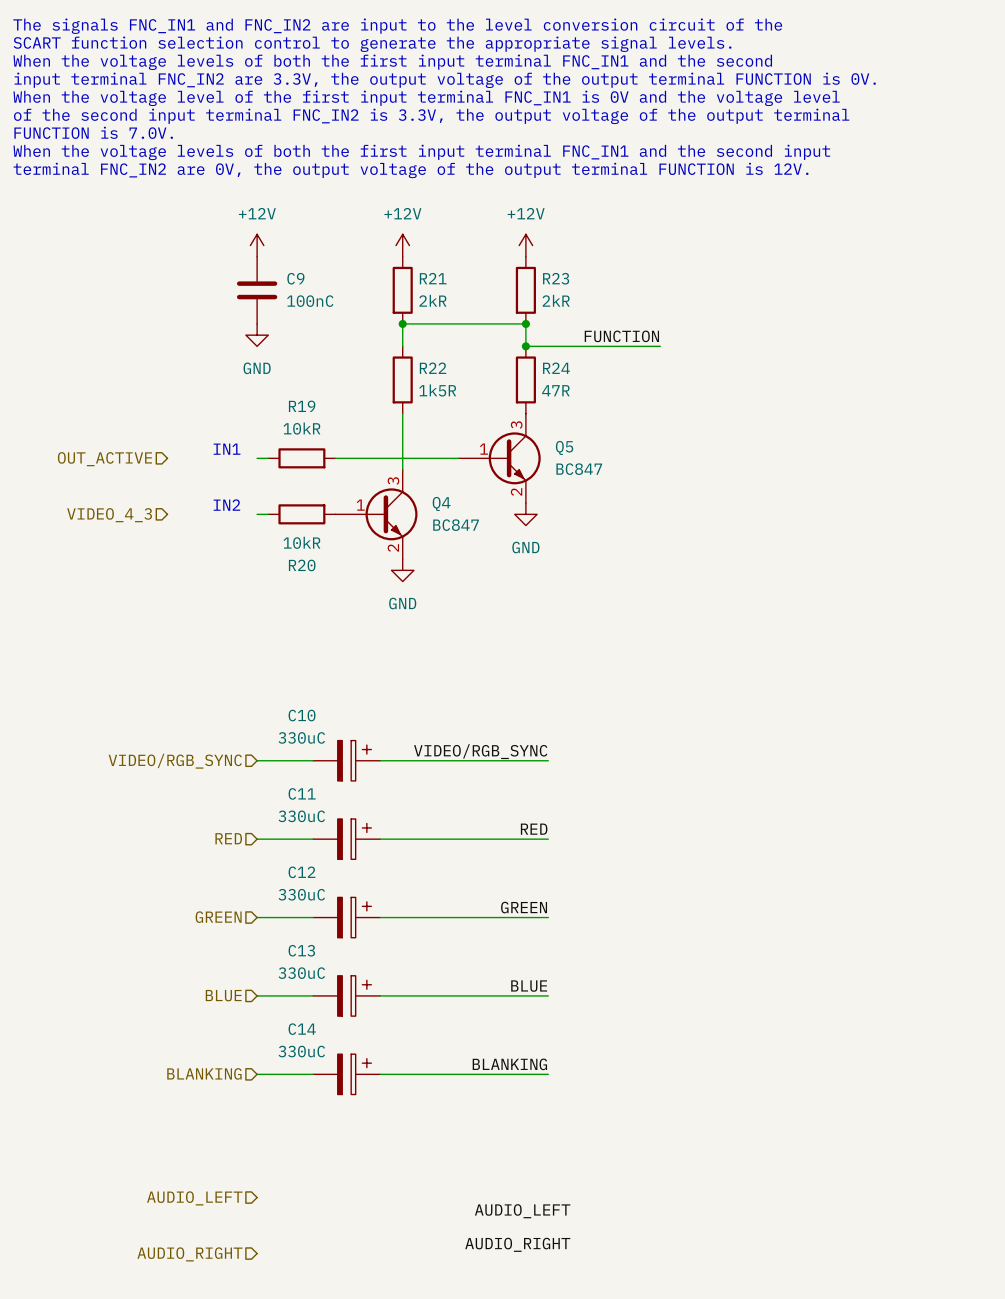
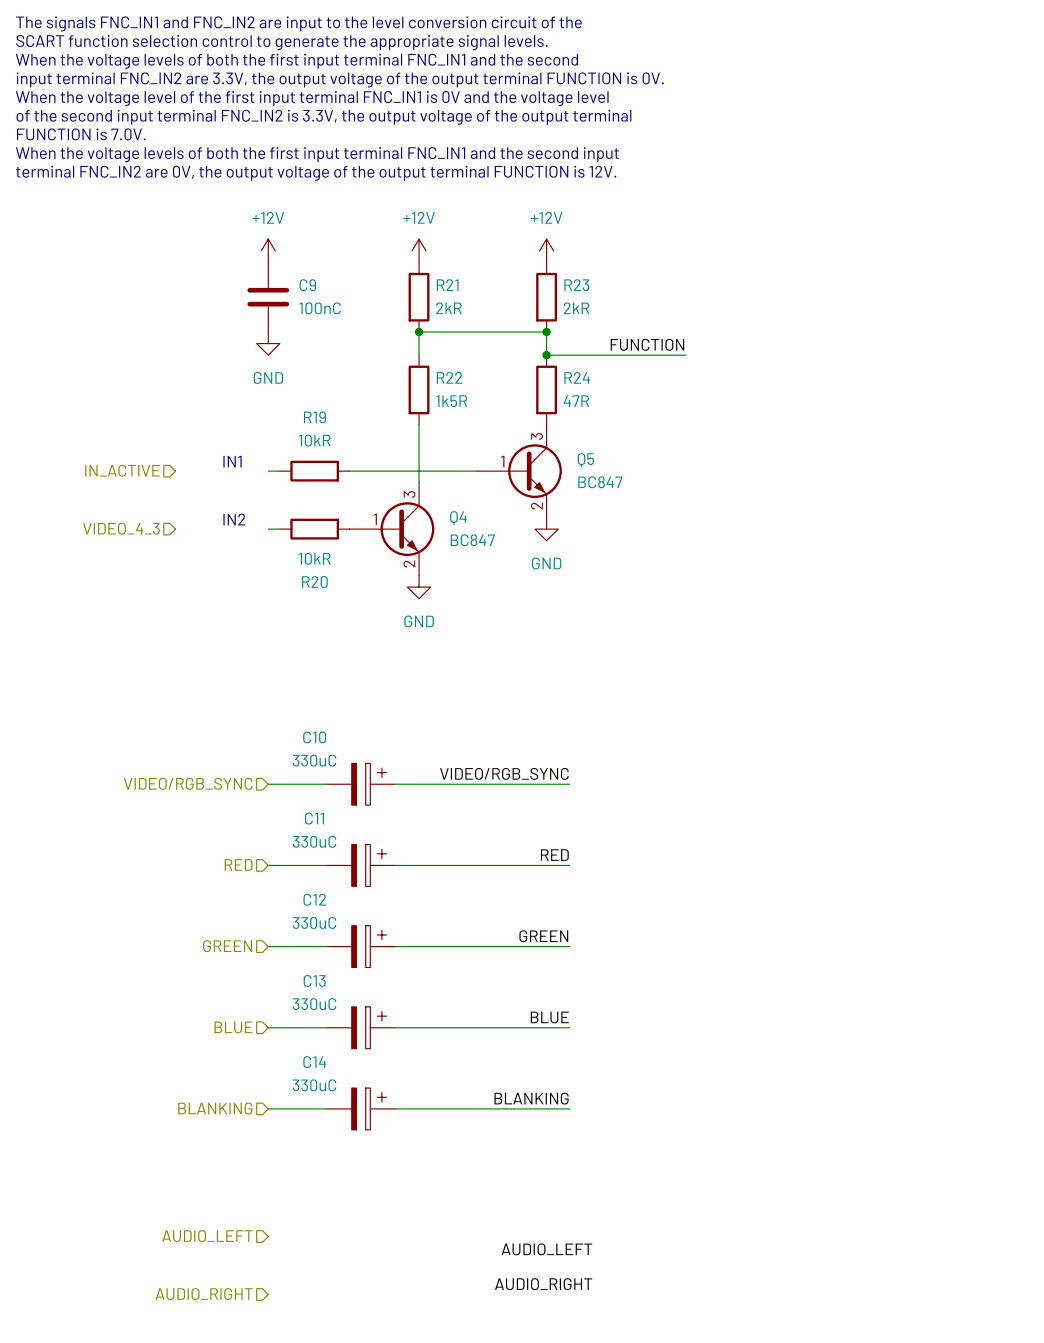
hierarchical label: OUT_ACTIVE (104, 459) -> IN_ACTIVE (122, 470)

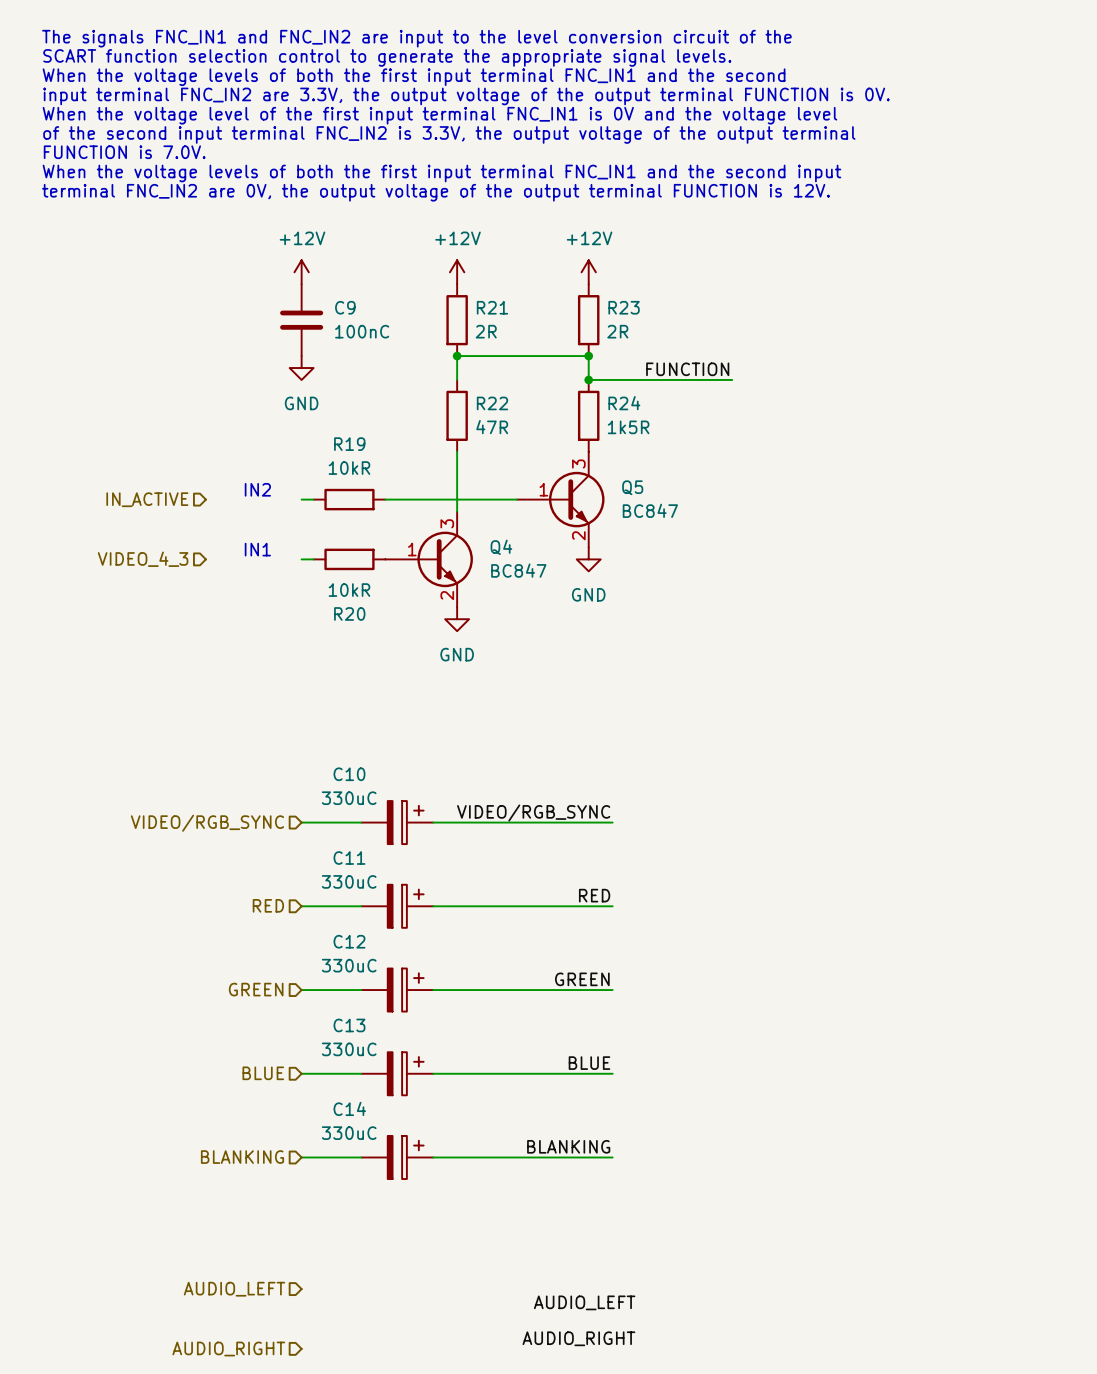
R21 value: 2kR (448, 308) -> 2R (486, 331)
R23 value: 2kR (576, 308) -> 2R (617, 331)
R22 value: 1k5R (451, 401) -> 47R (492, 427)
R24 value: 47R (576, 401) -> 1k5R (628, 427)
text position: IN1 (232, 461) -> IN1 (257, 549)
text position: IN2 (234, 519) -> IN2 (257, 489)

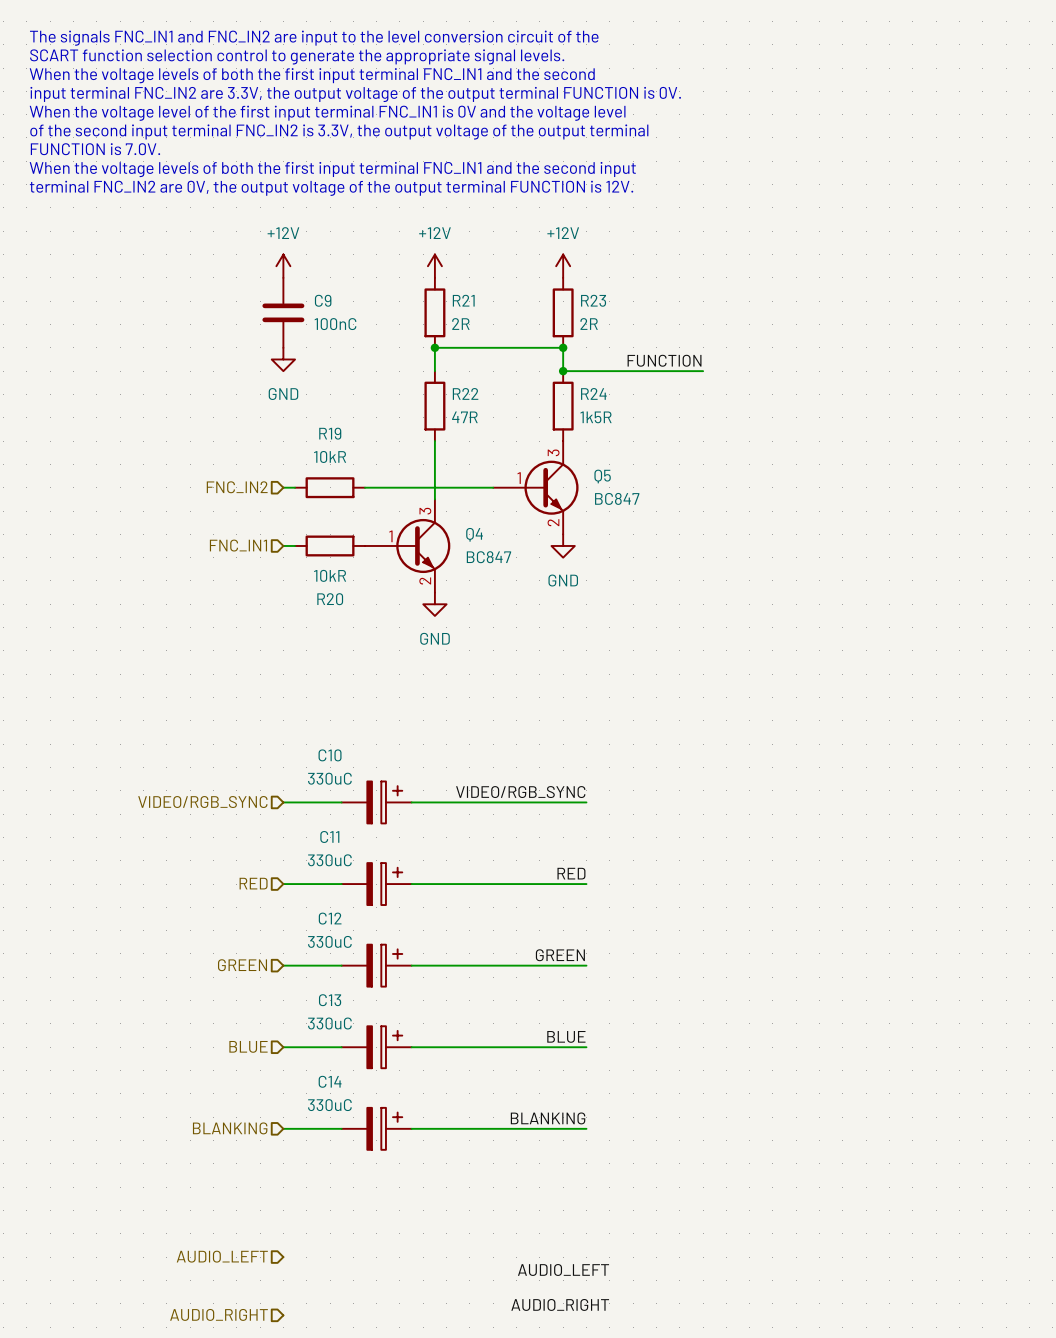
text: IN2 (257, 489) -> none
hierarchical label: IN_ACTIVE (147, 499) -> none
hierarchical label: none -> FNC_IN2 (237, 487)
text: IN1 (257, 549) -> none
hierarchical label: VIDEO_4_3 (143, 559) -> none
hierarchical label: none -> FNC_IN1 (238, 545)

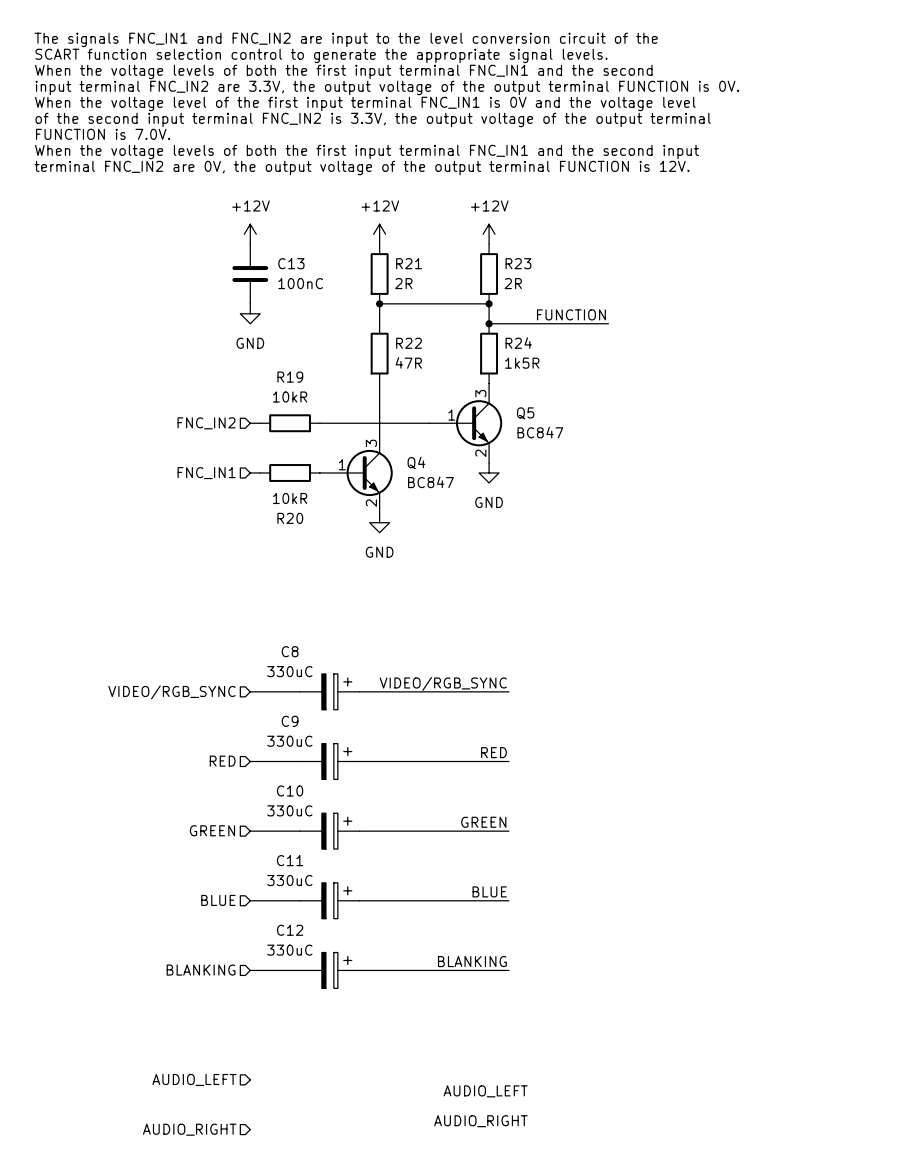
C9 name: C9 (323, 300) -> C13 (291, 263)
C10 name: C10 (330, 755) -> C8 (290, 651)
C11 name: C11 (329, 836) -> C9 (290, 721)
C12 name: C12 (330, 918) -> C10 (290, 790)
C13 name: C13 (330, 1000) -> C11 (290, 860)
C14 name: C14 (330, 1081) -> C12 (290, 930)

